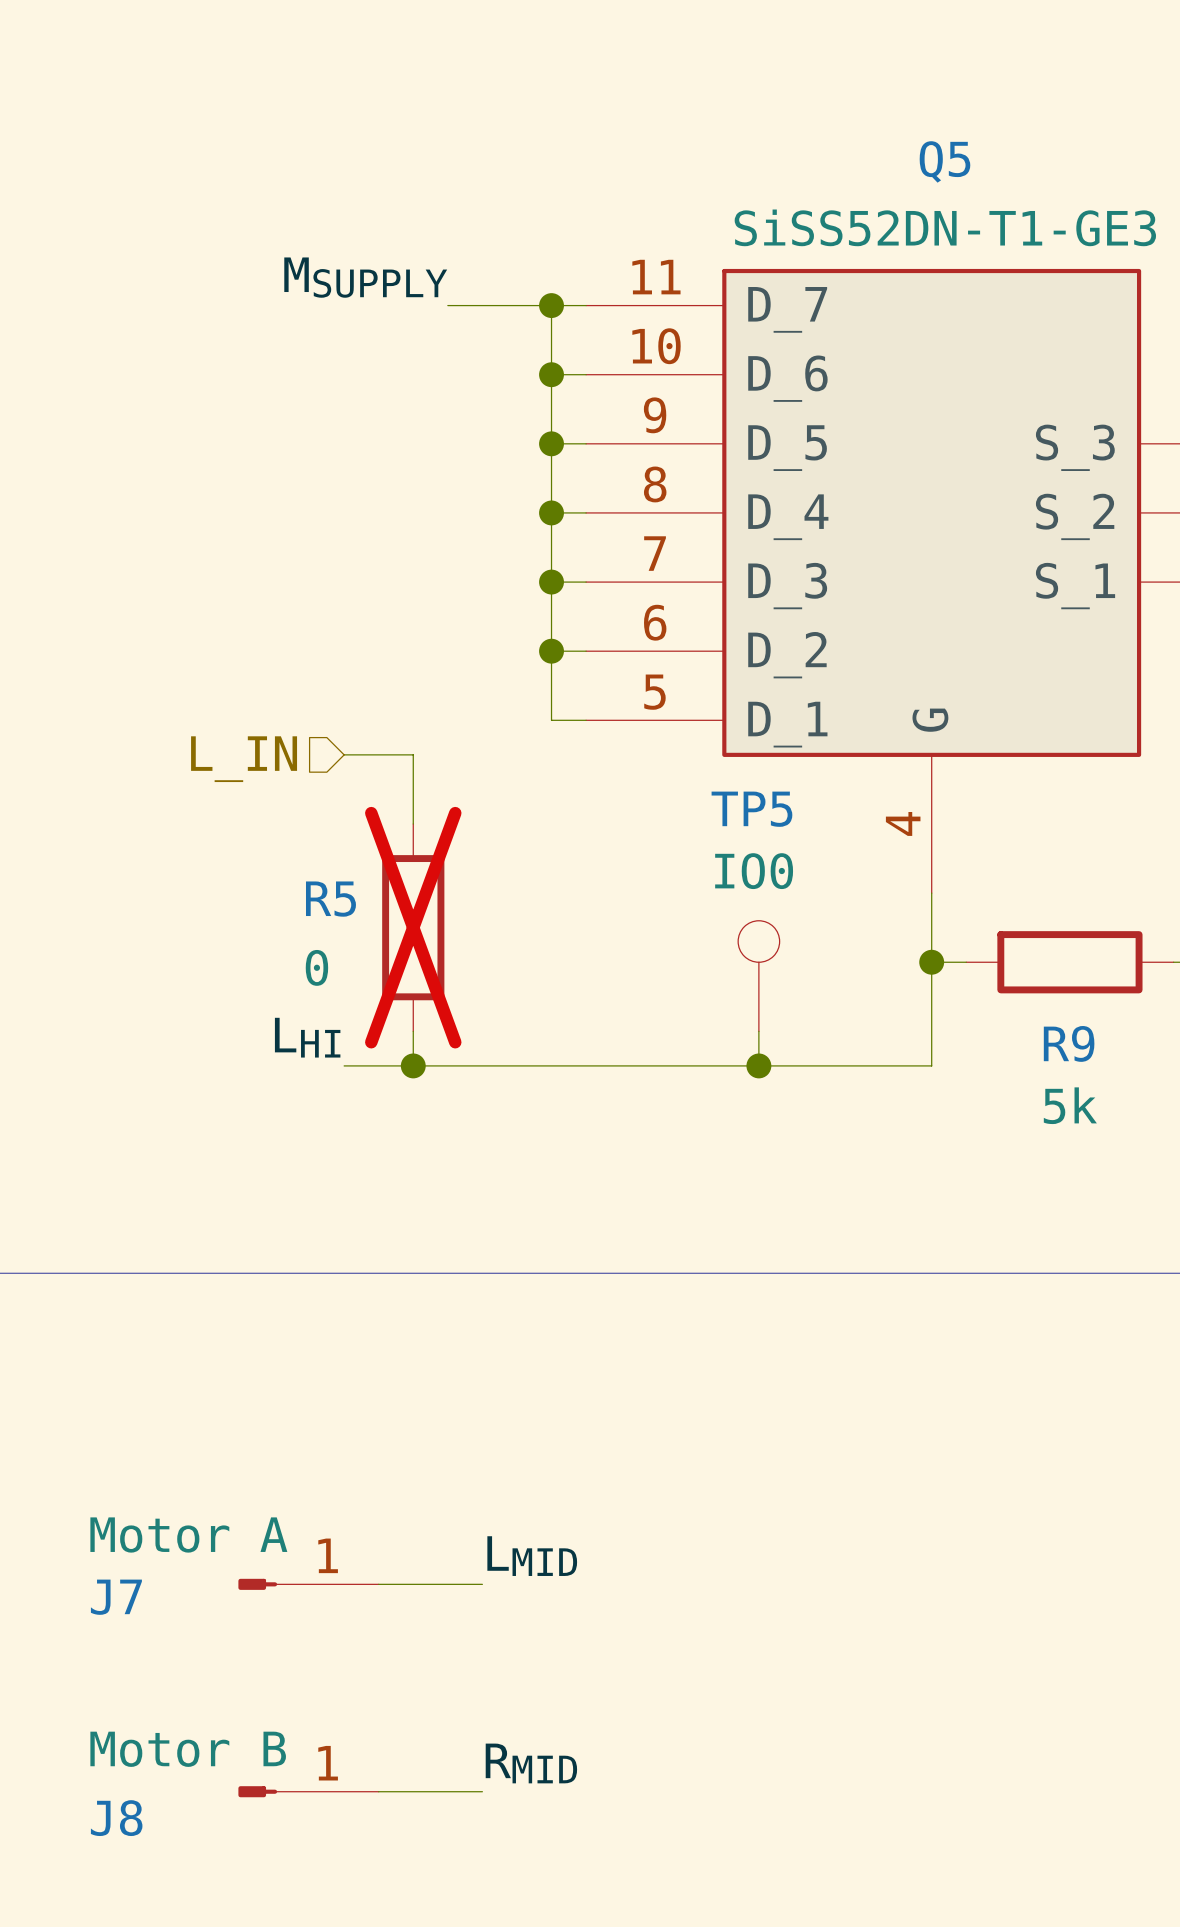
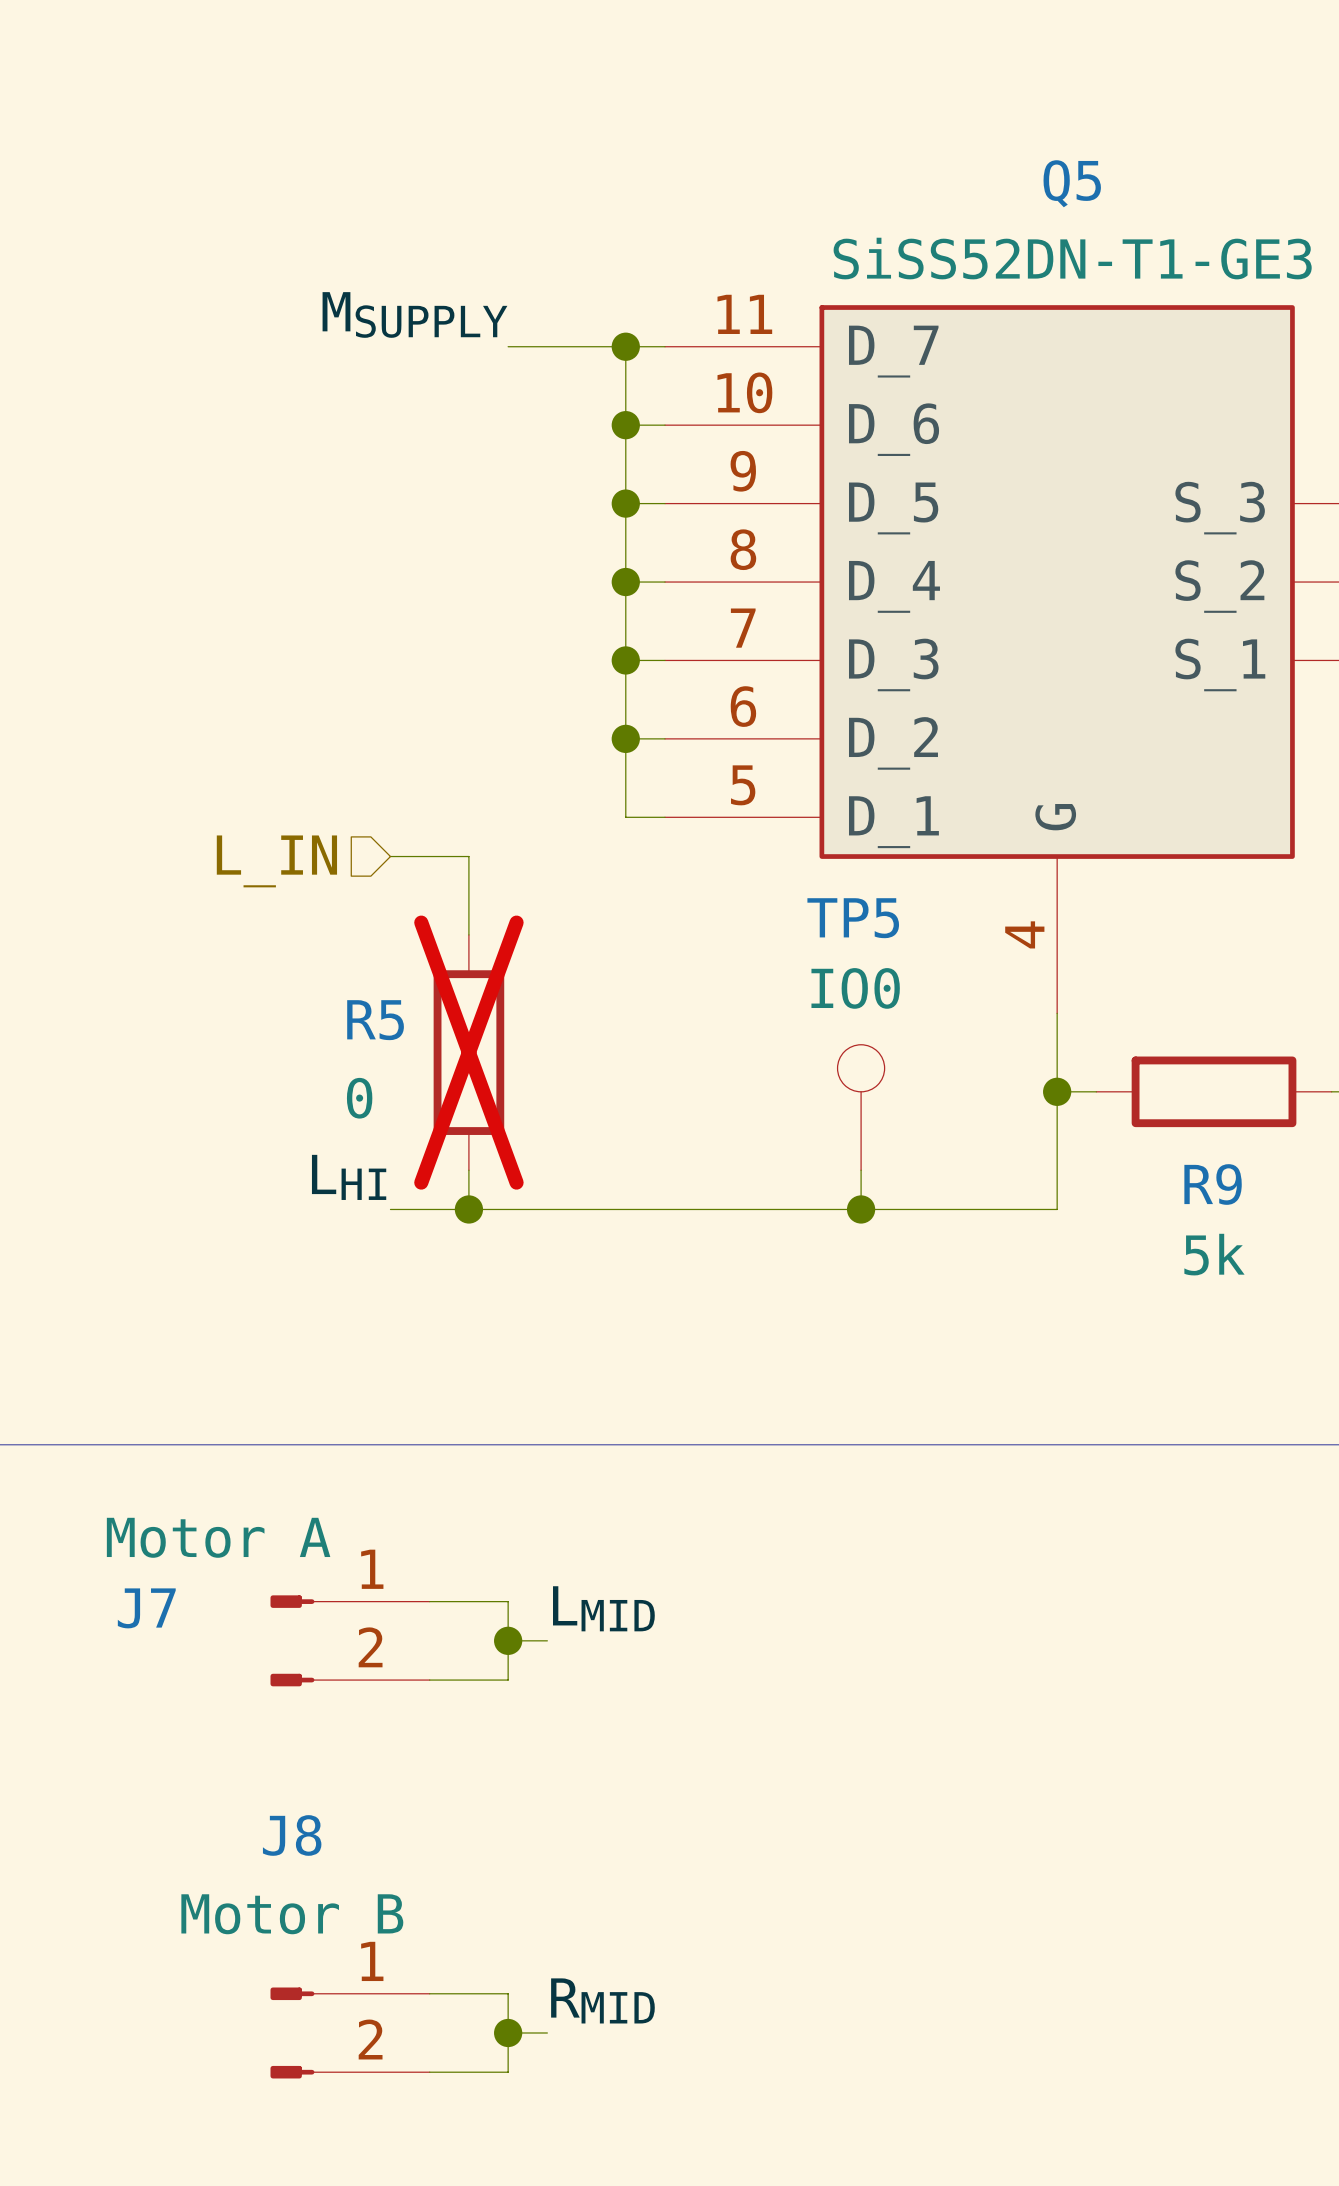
wire: none -> (429, 1601) (508, 1601) (508, 1680) (429, 1680)
wire: none -> (508, 1640) (547, 1640)
junction: none -> (508, 1640)
label position: LMID (532, 1556) -> LMID (603, 1608)
J7 symbol: [238, 1578, 379, 1590] -> [270, 1595, 430, 1687]
wire: (378, 1584) (482, 1584) -> none
J8 value position: Motor B (188, 1749) -> Motor B (292, 1914)
wire: none -> (429, 1993) (508, 1993) (508, 2072) (429, 2072)
J8 symbol: [238, 1786, 379, 1798] -> [270, 1987, 430, 2079]
wire: (378, 1791) (447, 1791) -> none
junction: none -> (508, 2032)
J8 name position: J8 (116, 1818) -> J8 (292, 1835)

